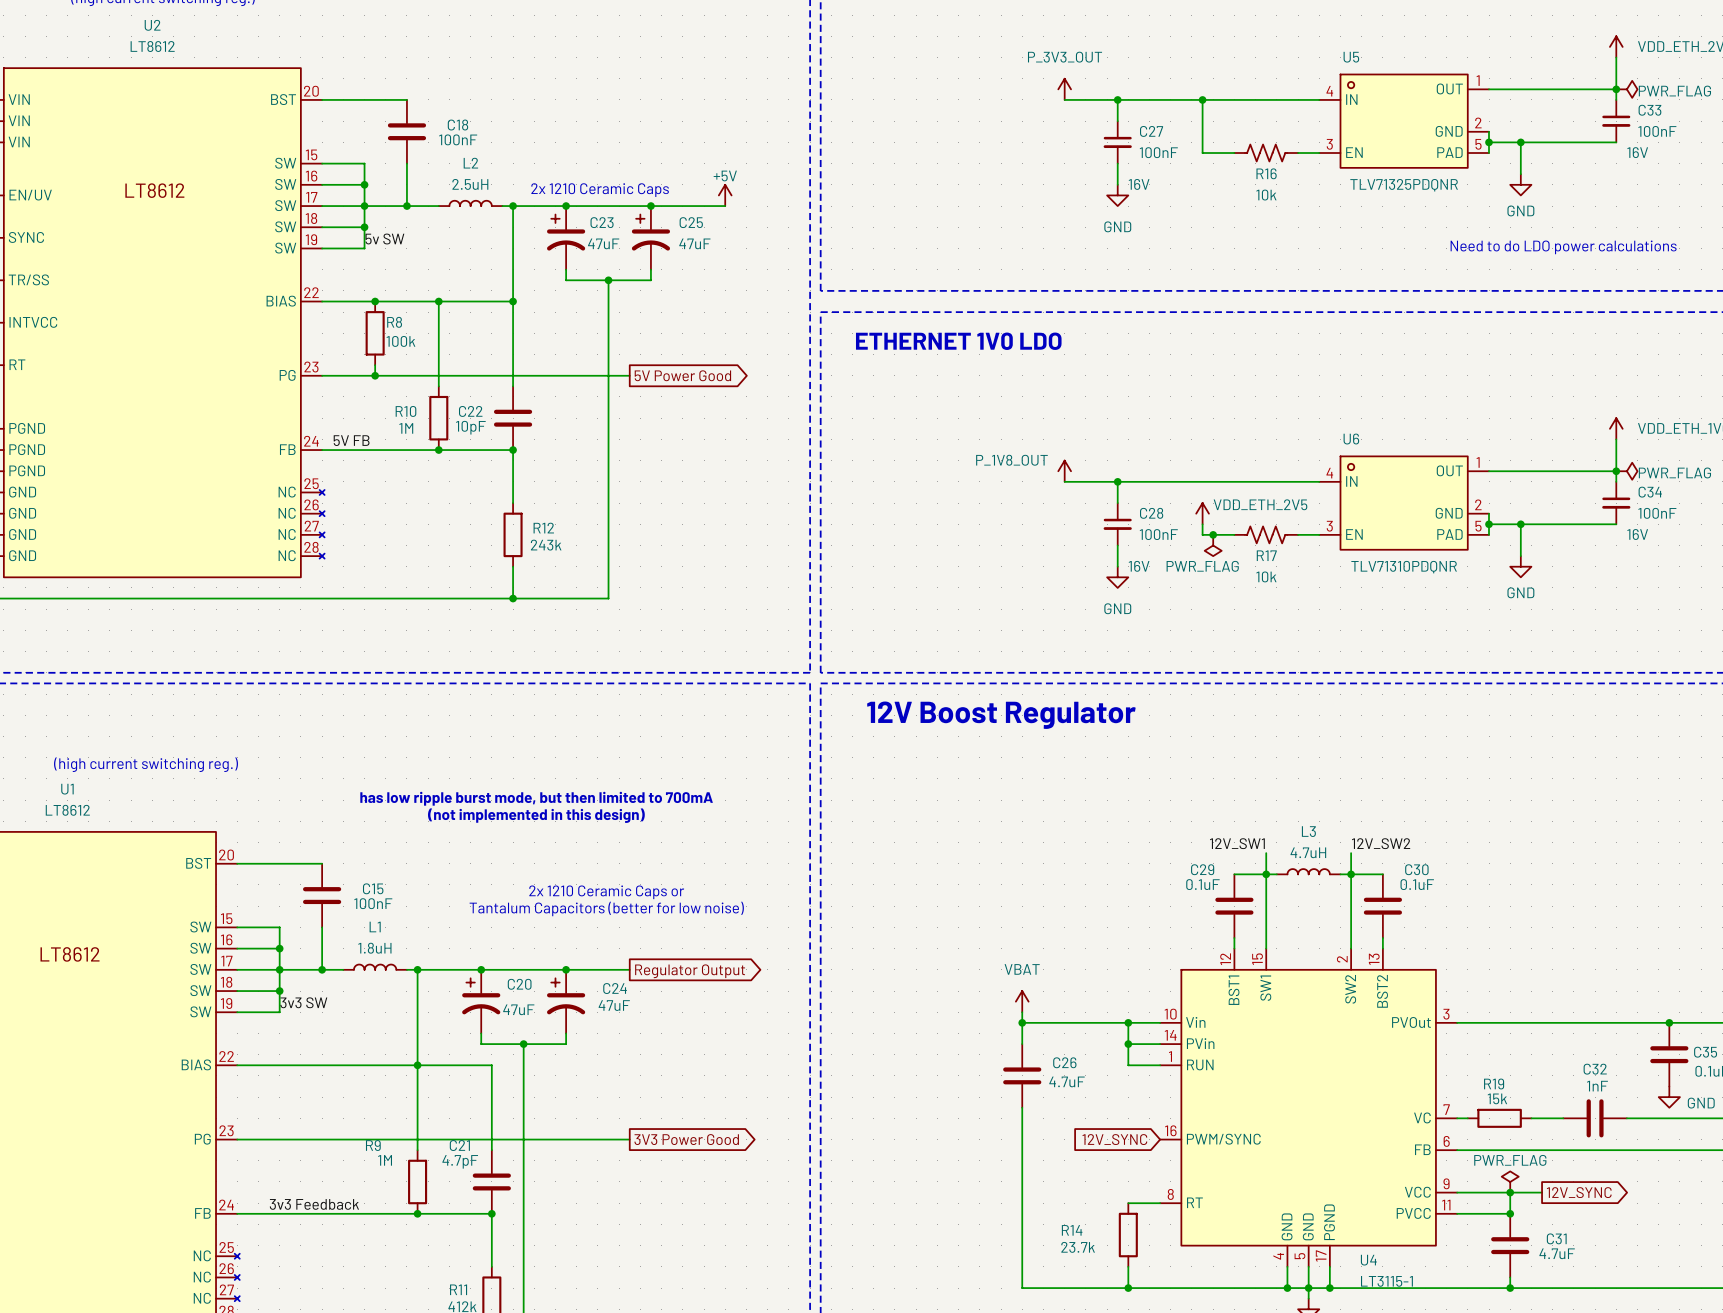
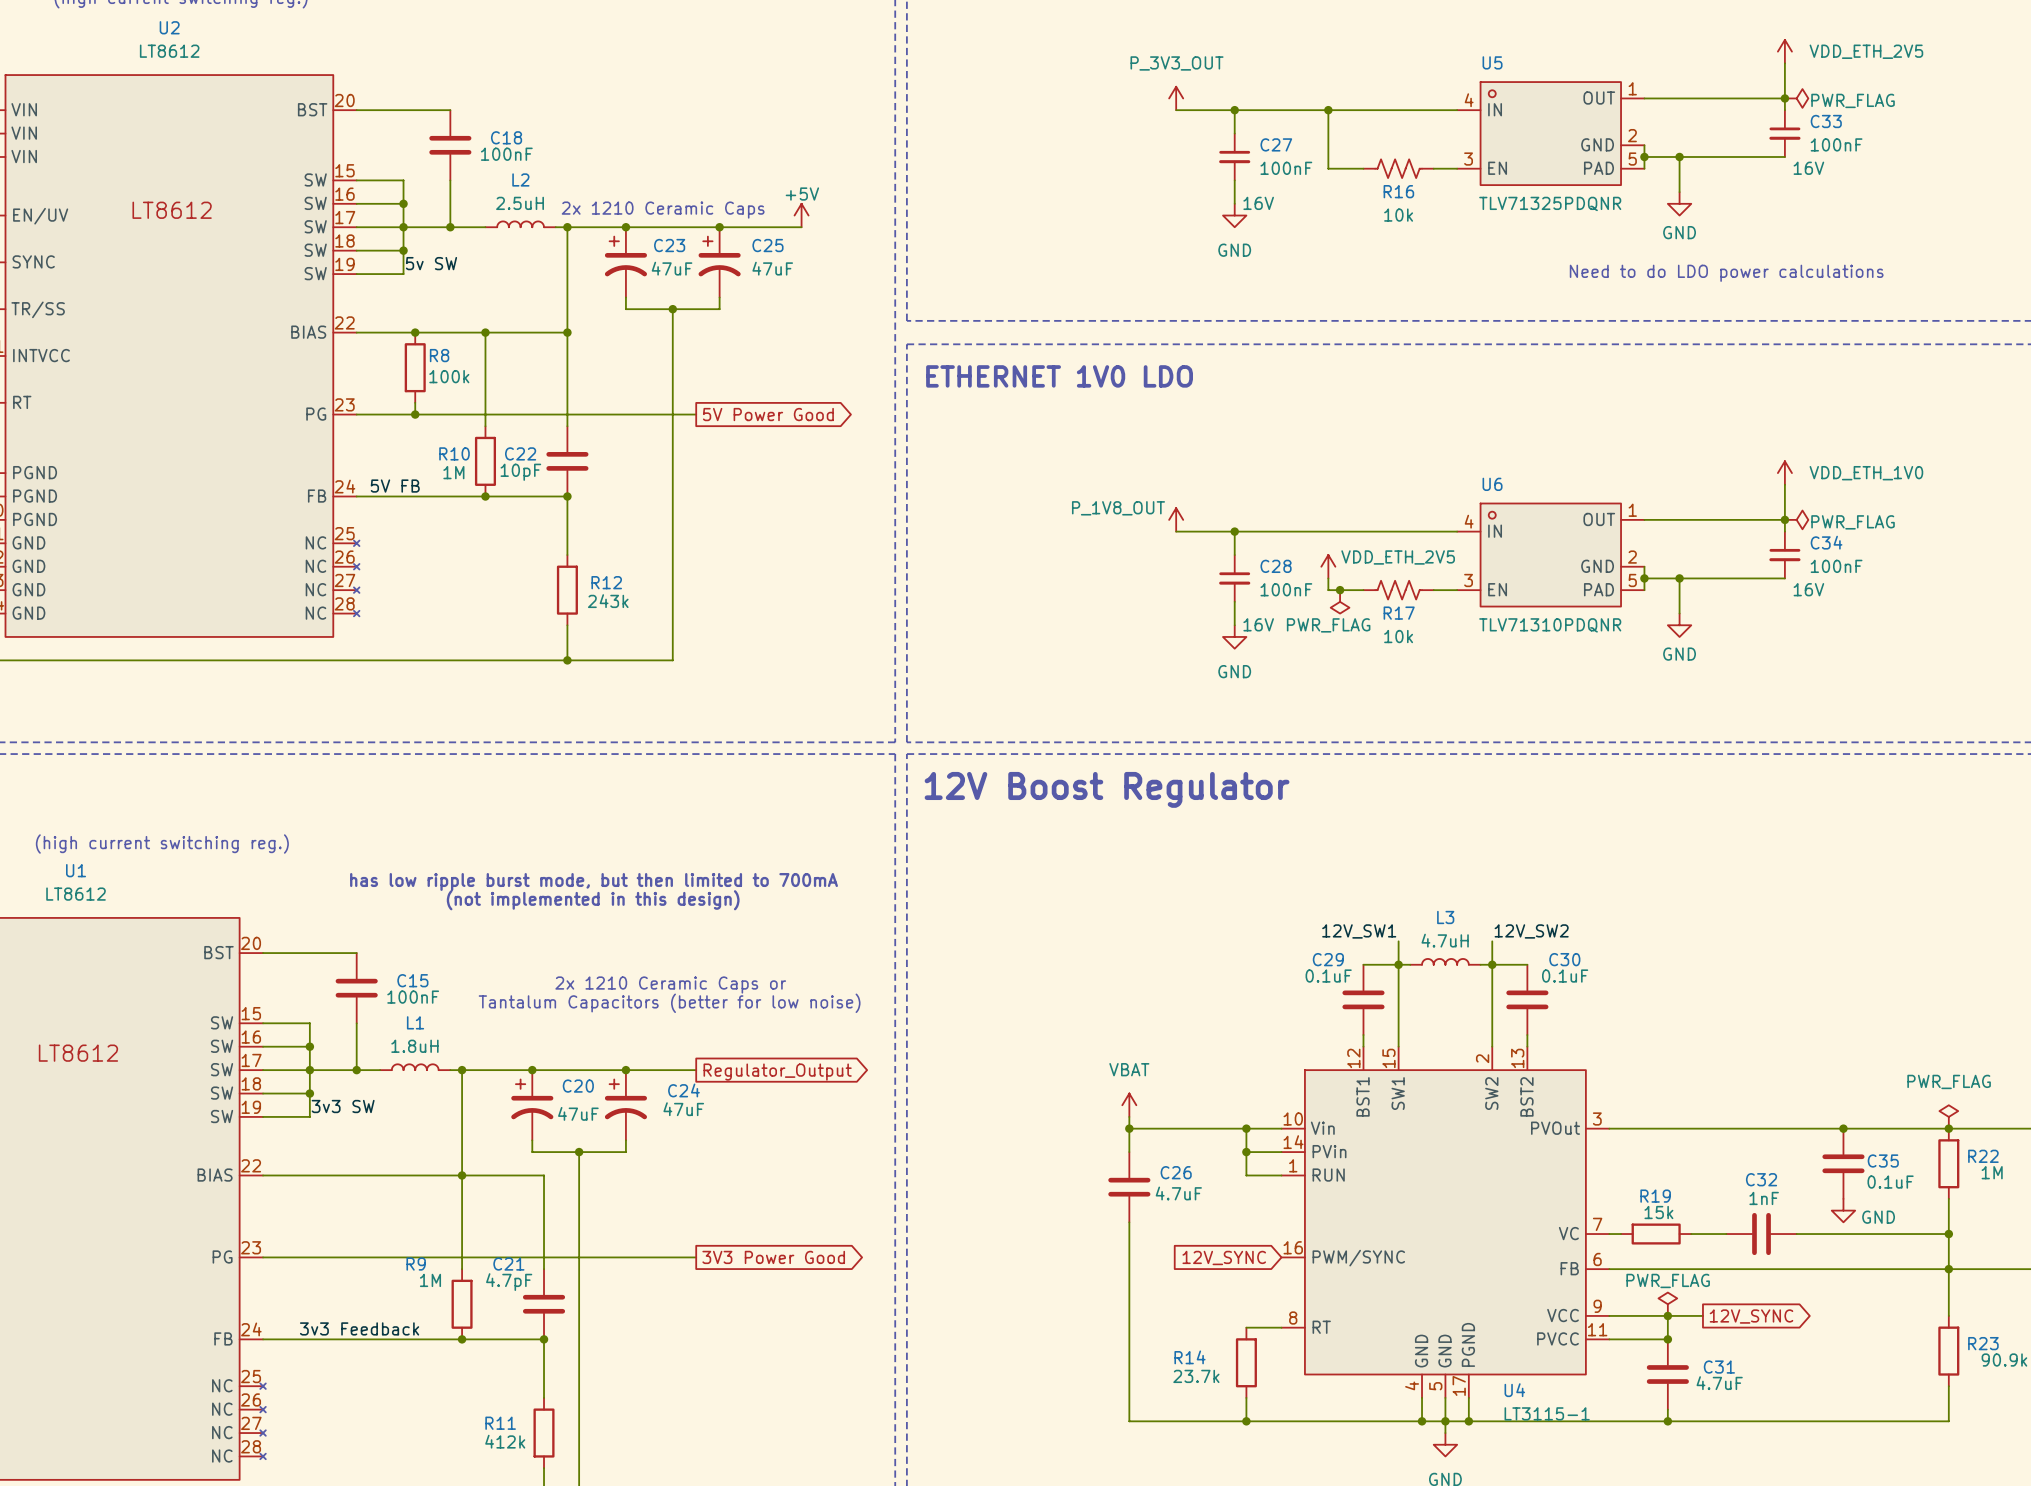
global label: Regulator Output (690, 971) -> Regulator_Output (777, 1072)

